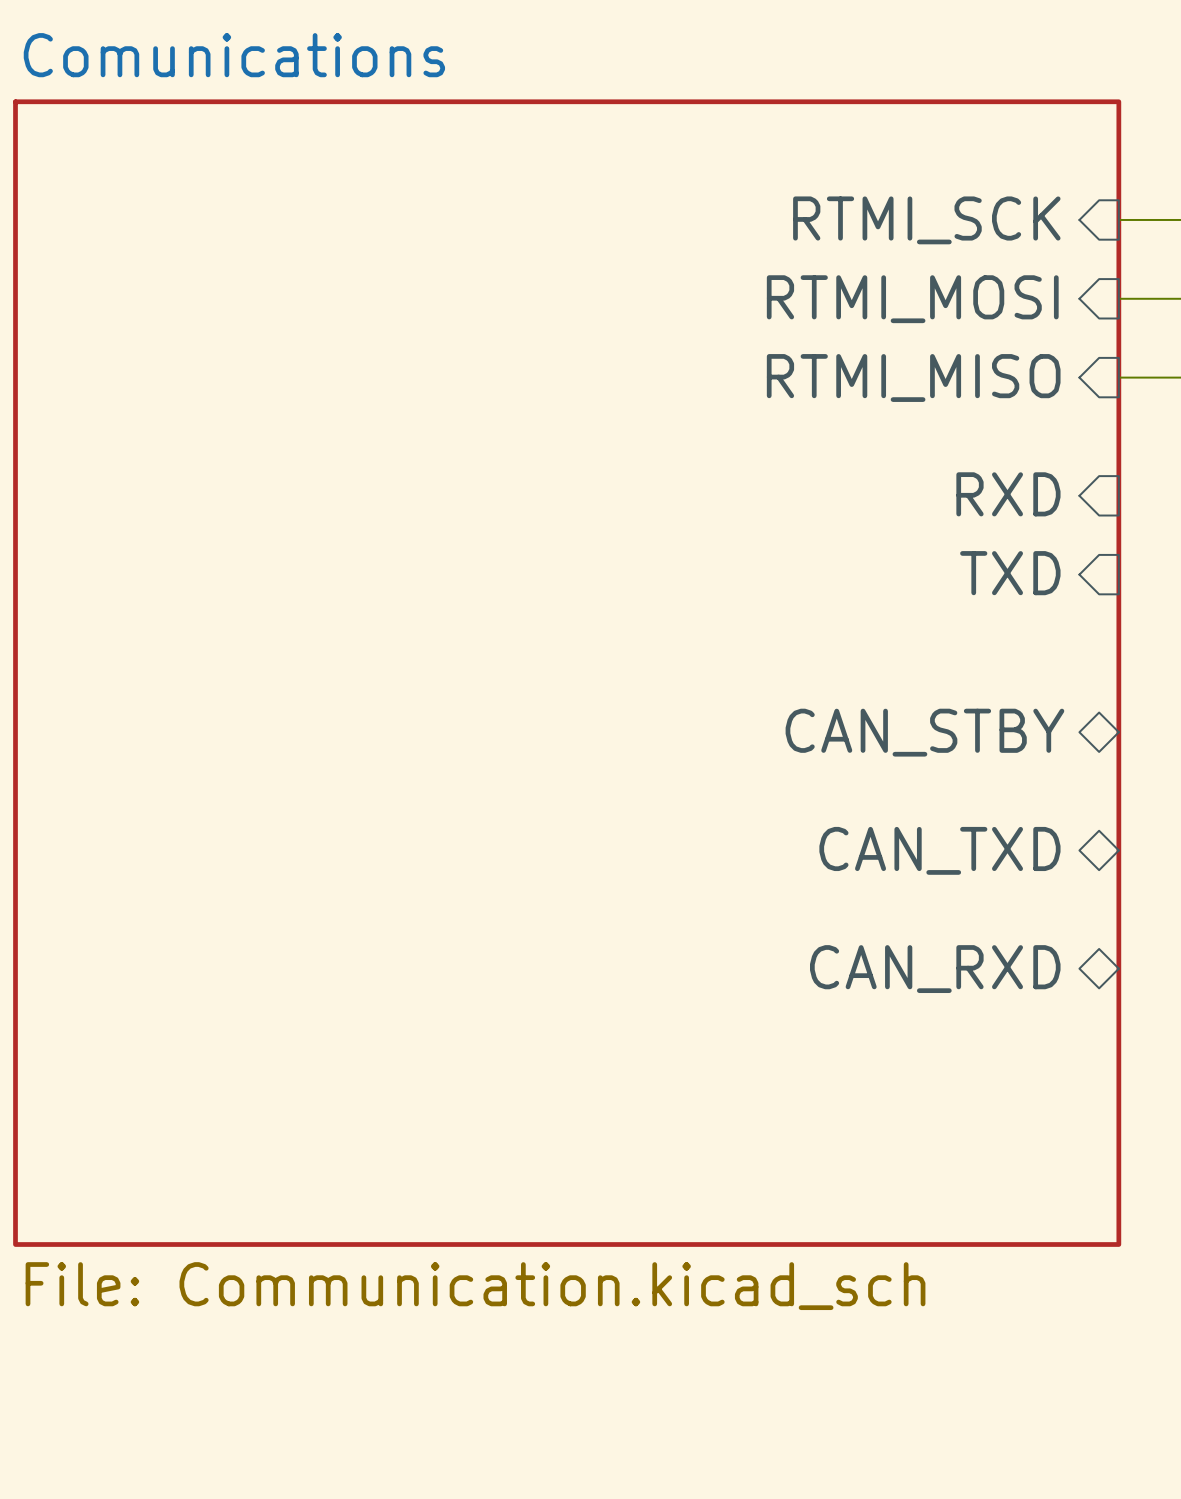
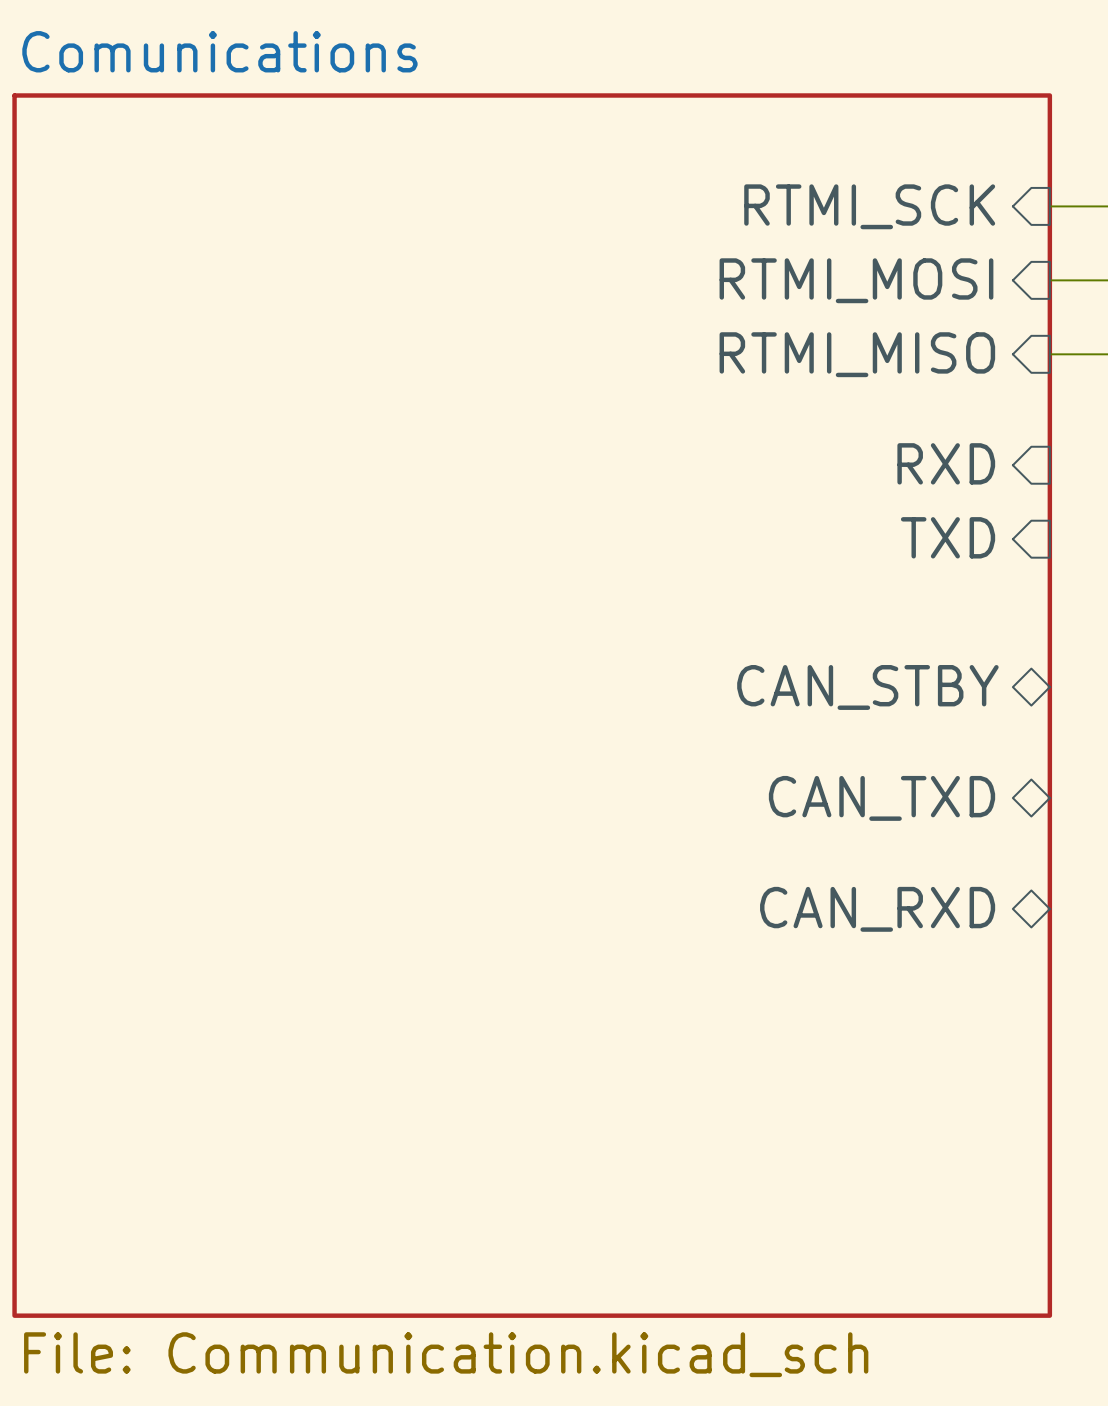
sheet Comunications: File: Communication.kicad_sch (567, 673) -> none
sheet Comunications: none -> File: Communication.kicad_sch (532, 705)

